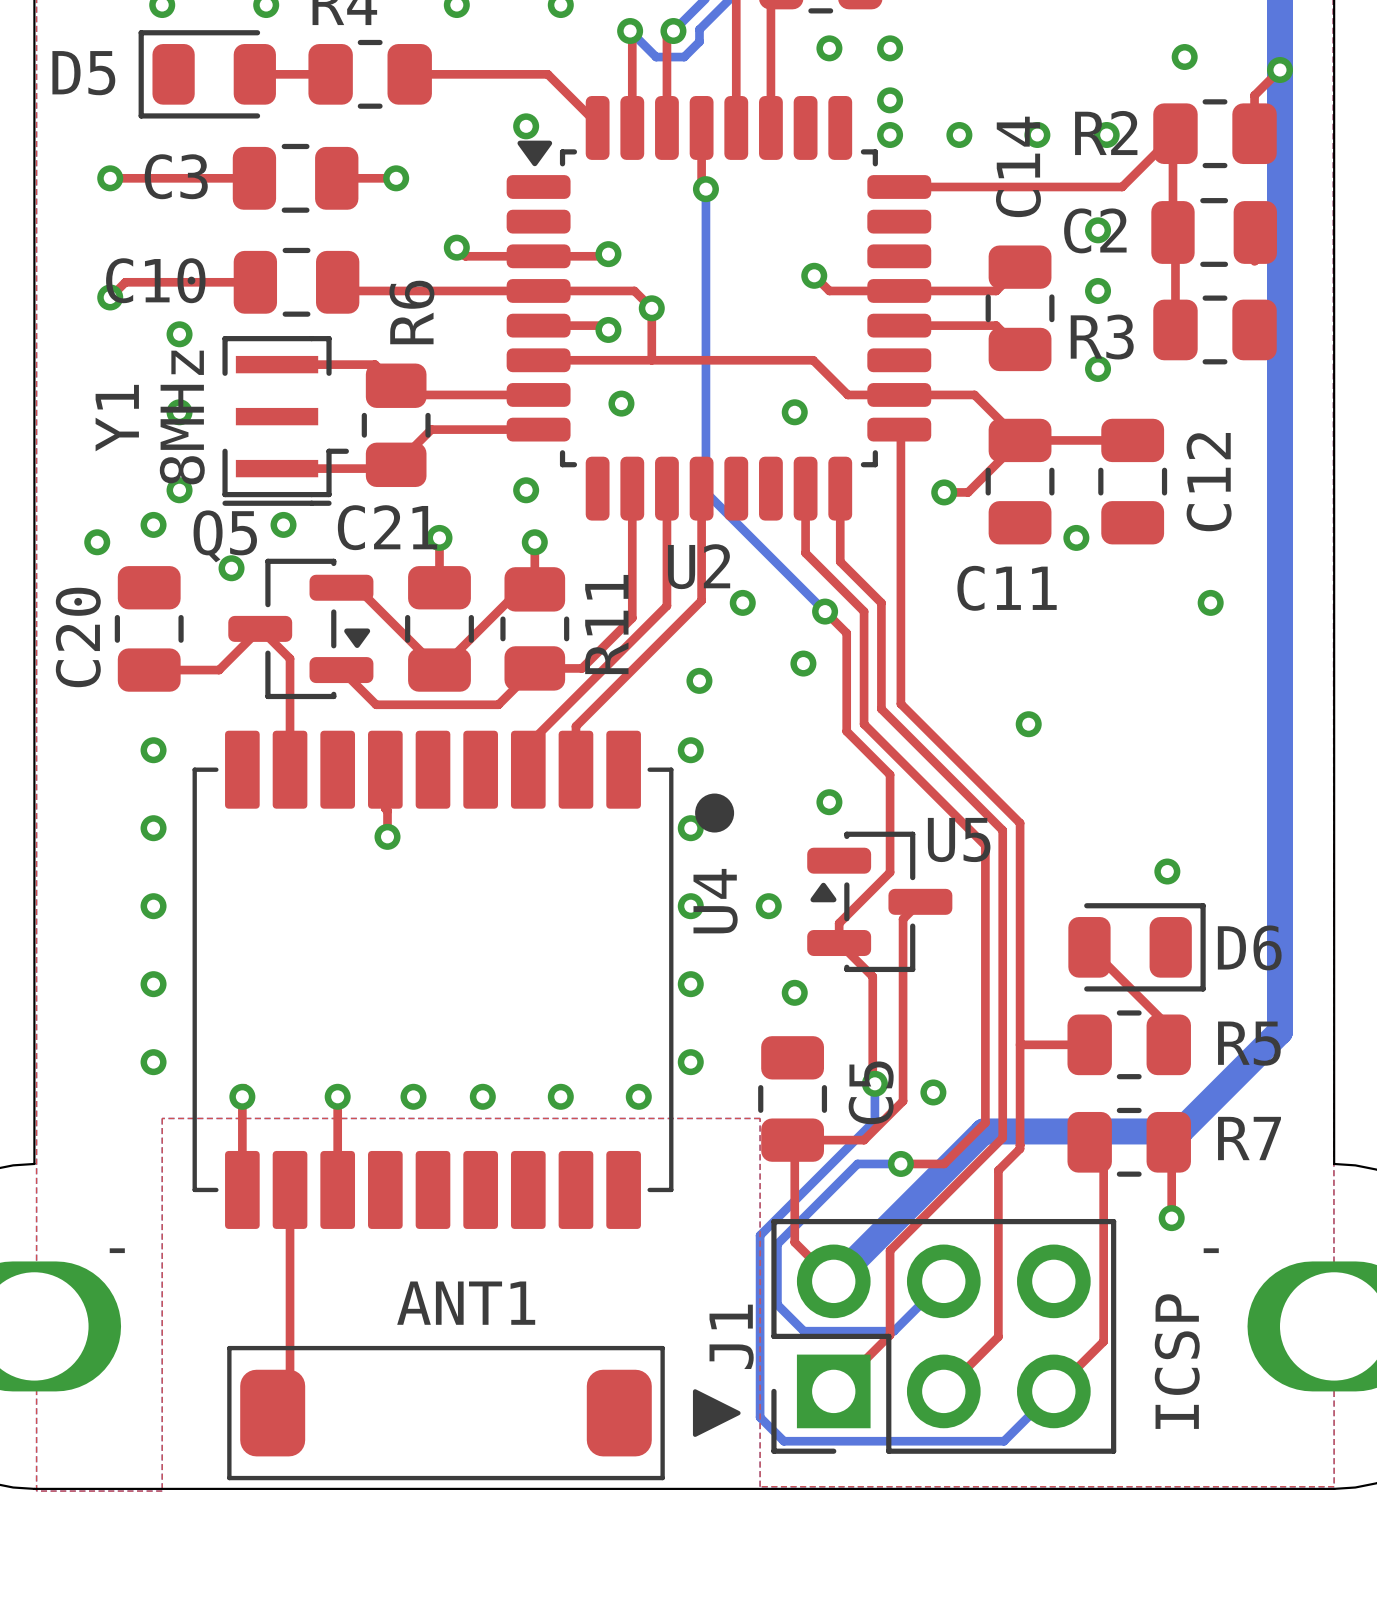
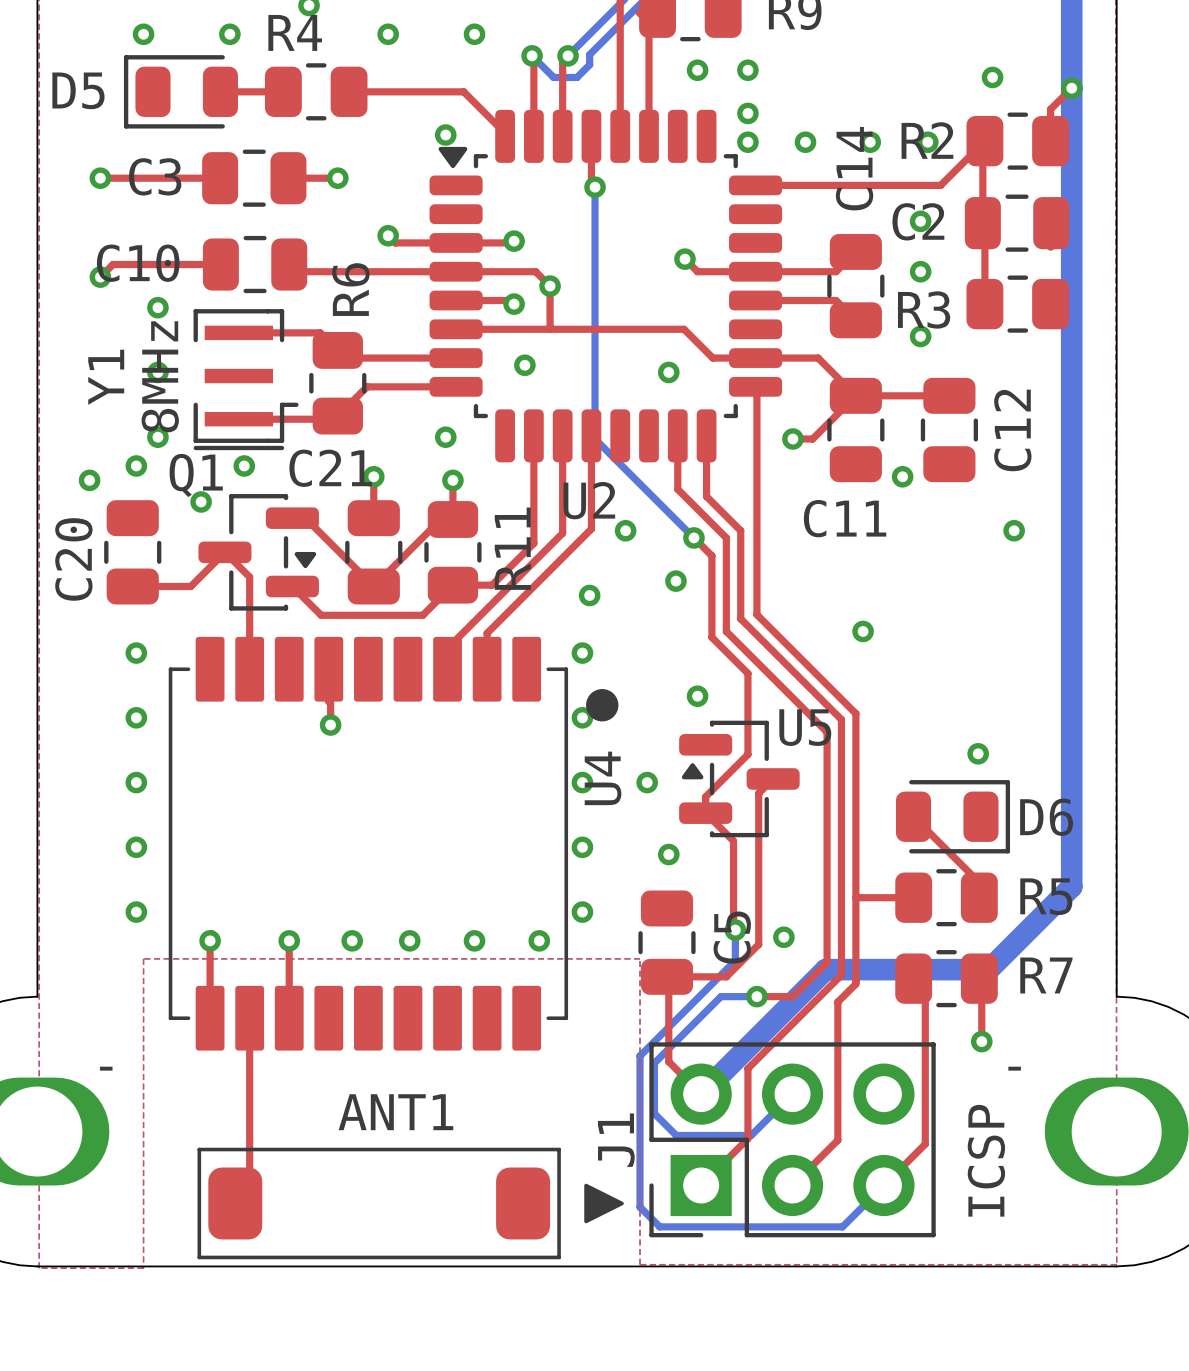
Q5 name: Q5 (225, 536) -> Q1 (196, 475)

